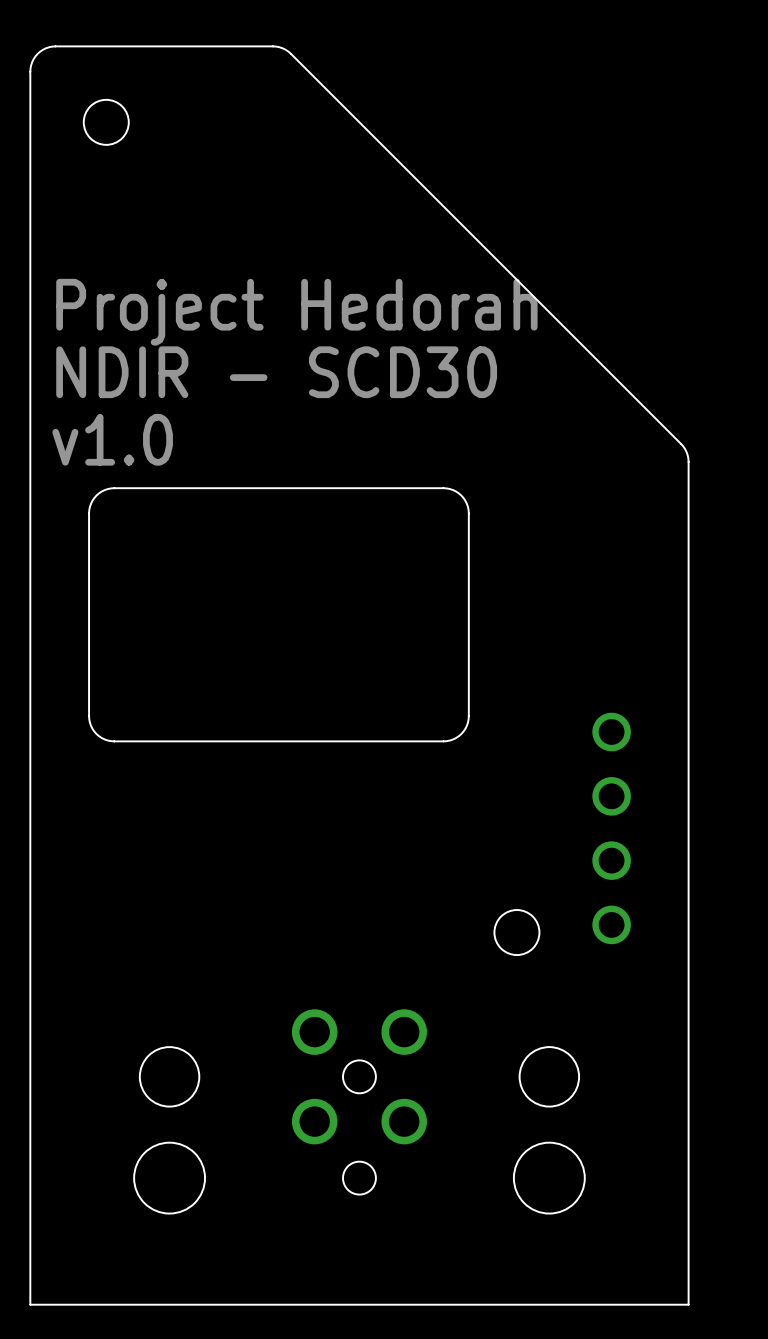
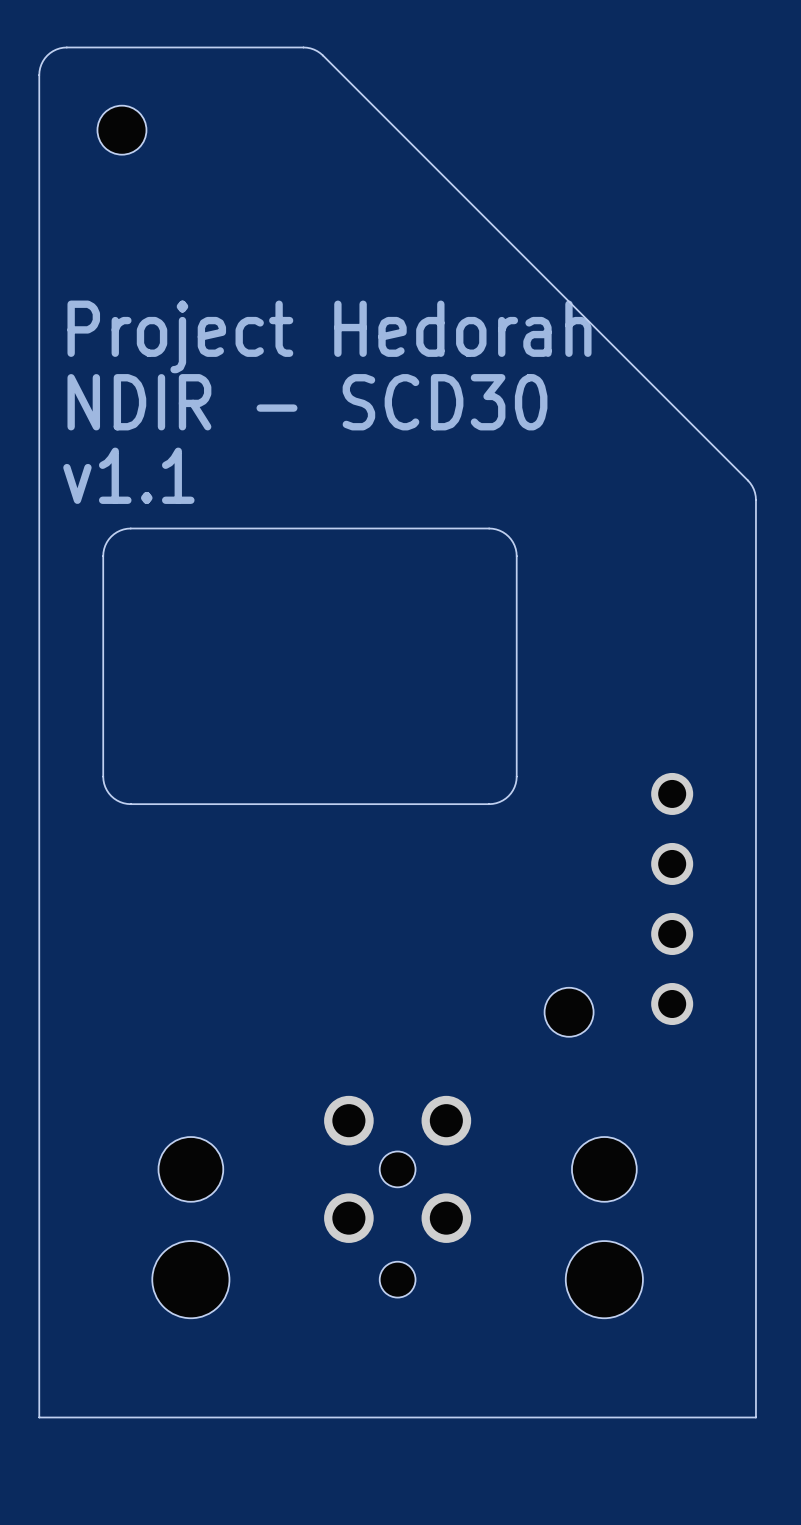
text: v1.0 (112, 439) -> v1.1 (128, 475)

